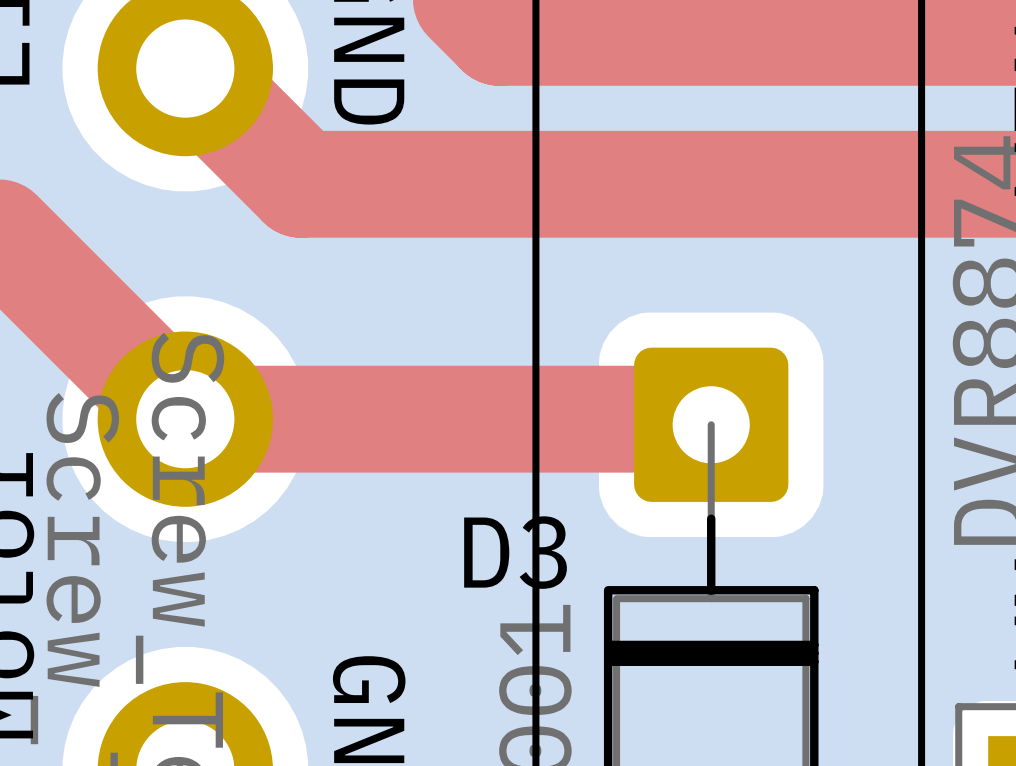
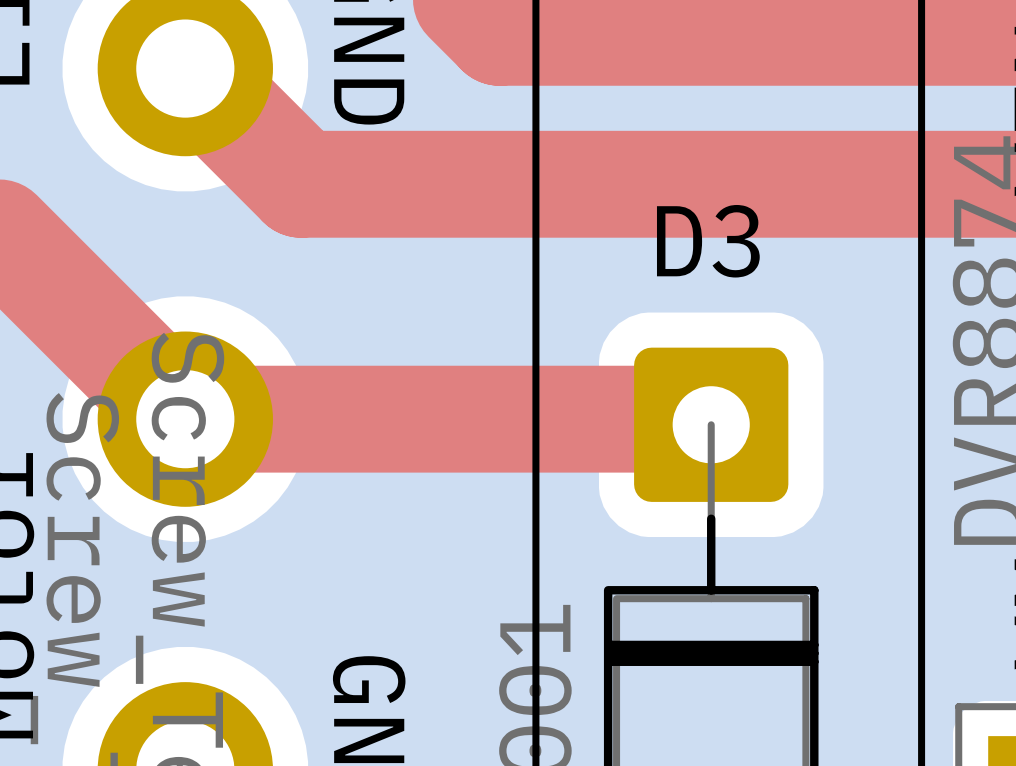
D3 name position: D3 (515, 552) -> D3 (708, 241)

